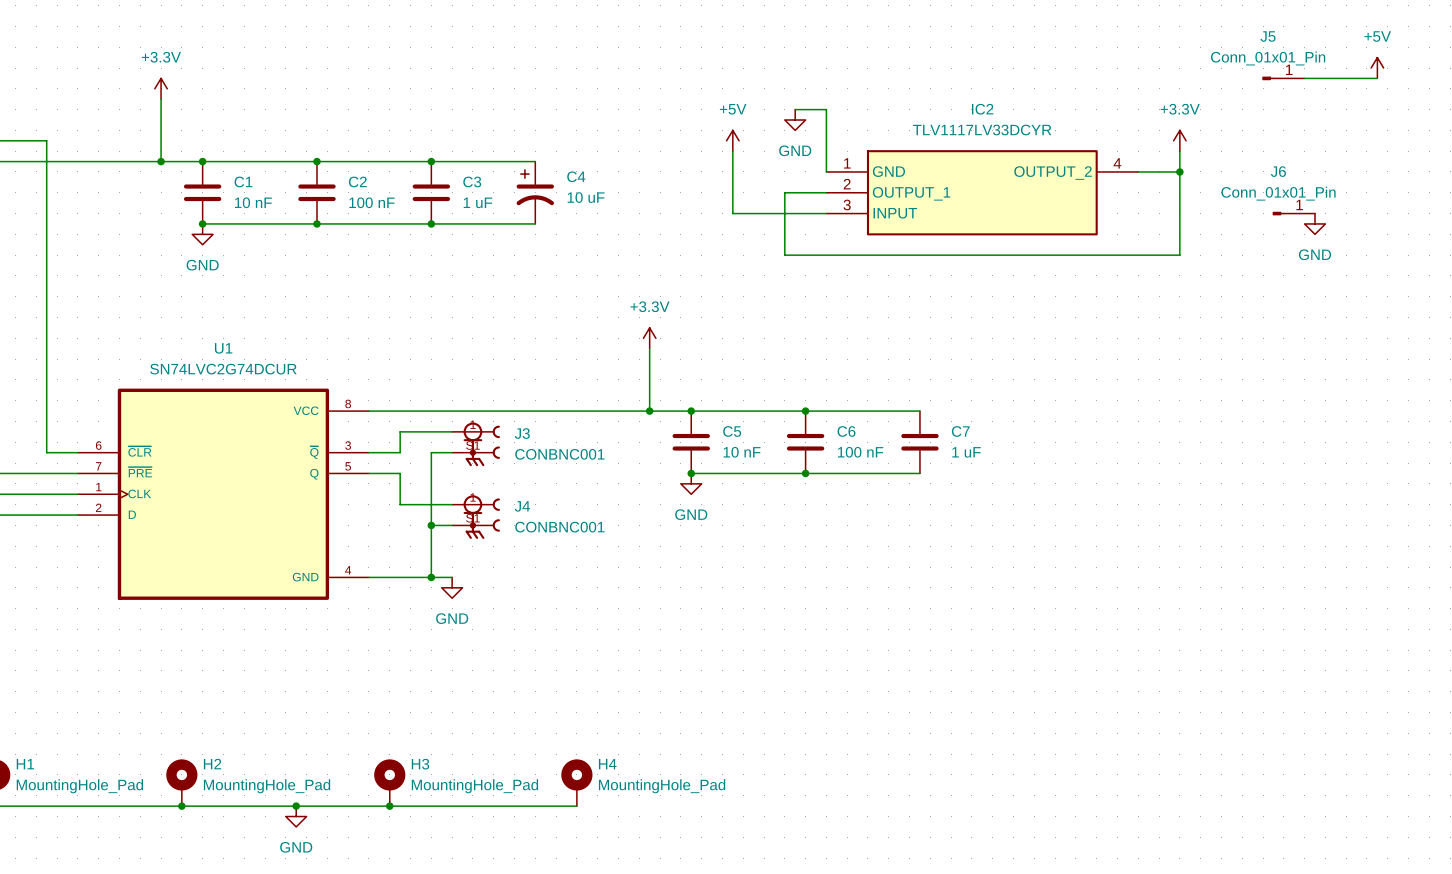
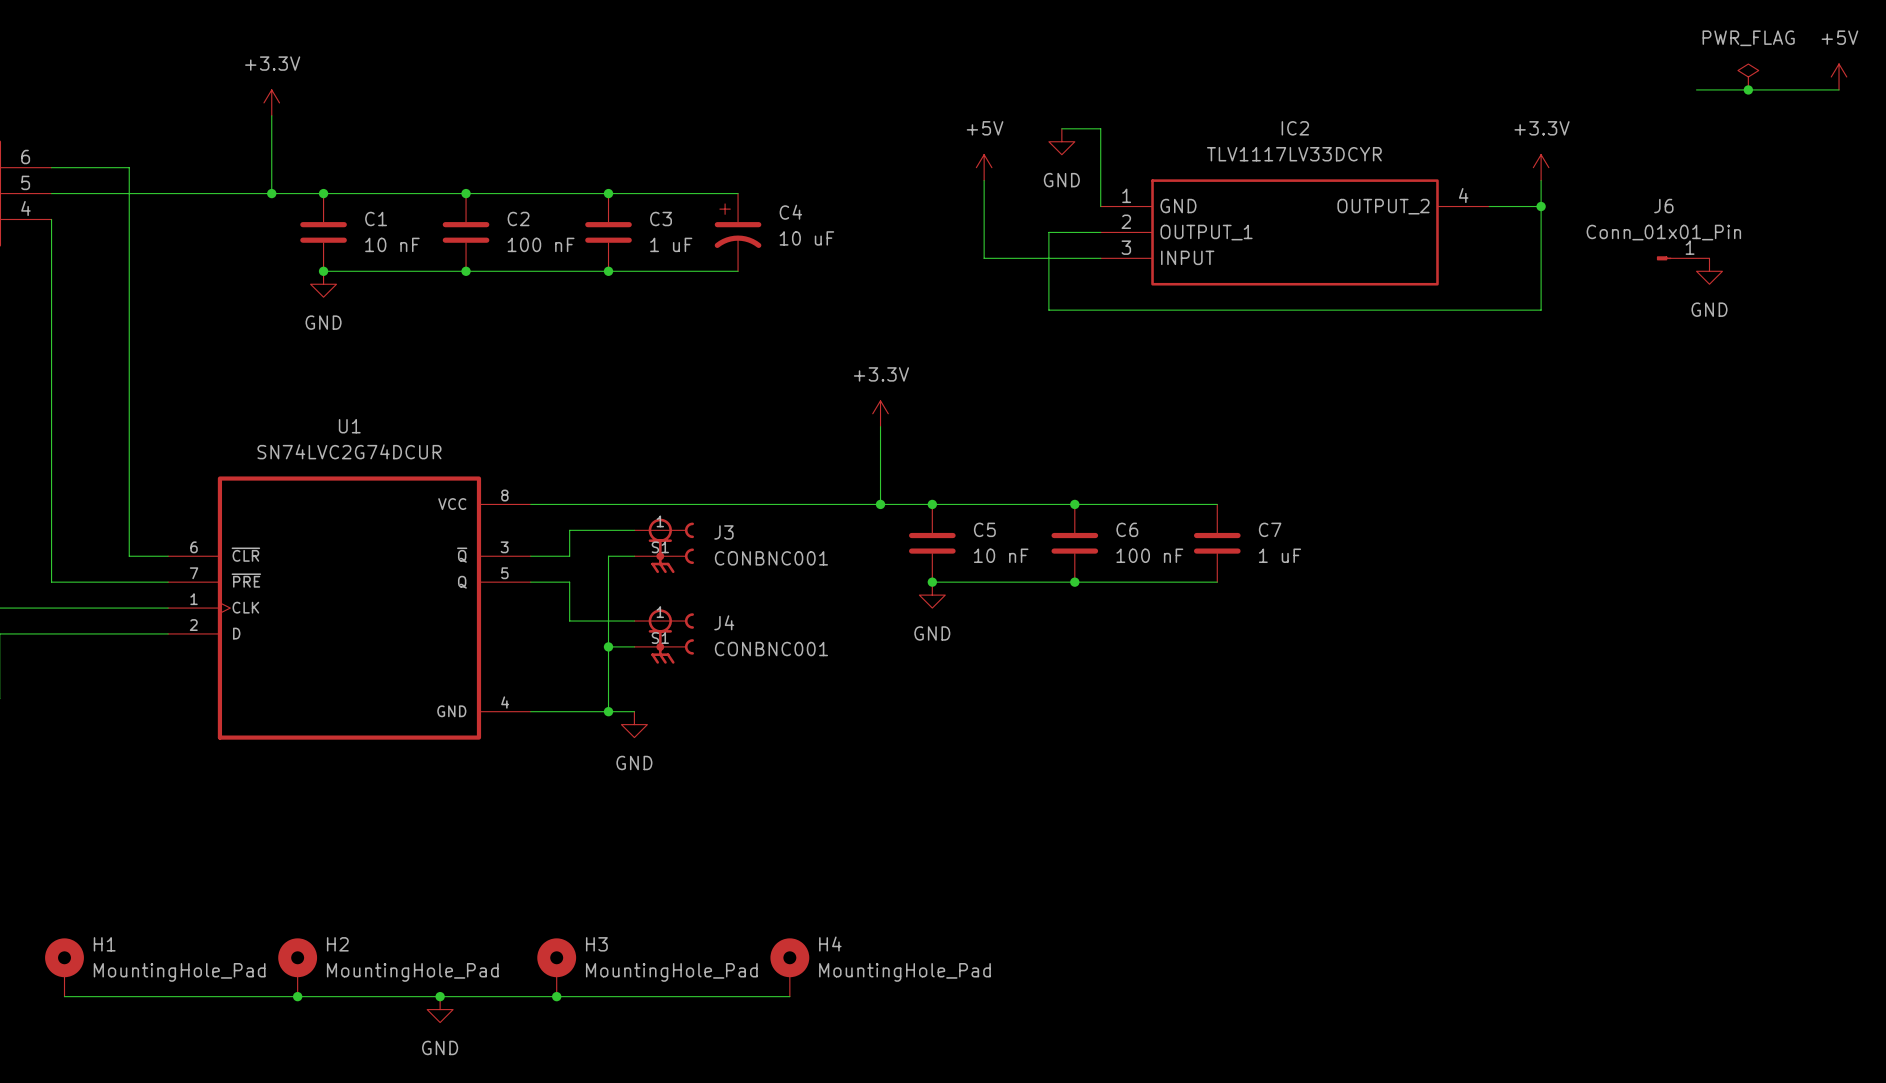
power symbol: none -> PWR_FLAG (1748, 77)
power symbol position: +5V (1377, 68) -> +5V (1839, 77)
J5: Conn_01x01_Pin (1283, 78) -> none
junction: none -> (1748, 89)
wire: none -> (1787, 89) (1839, 89)

